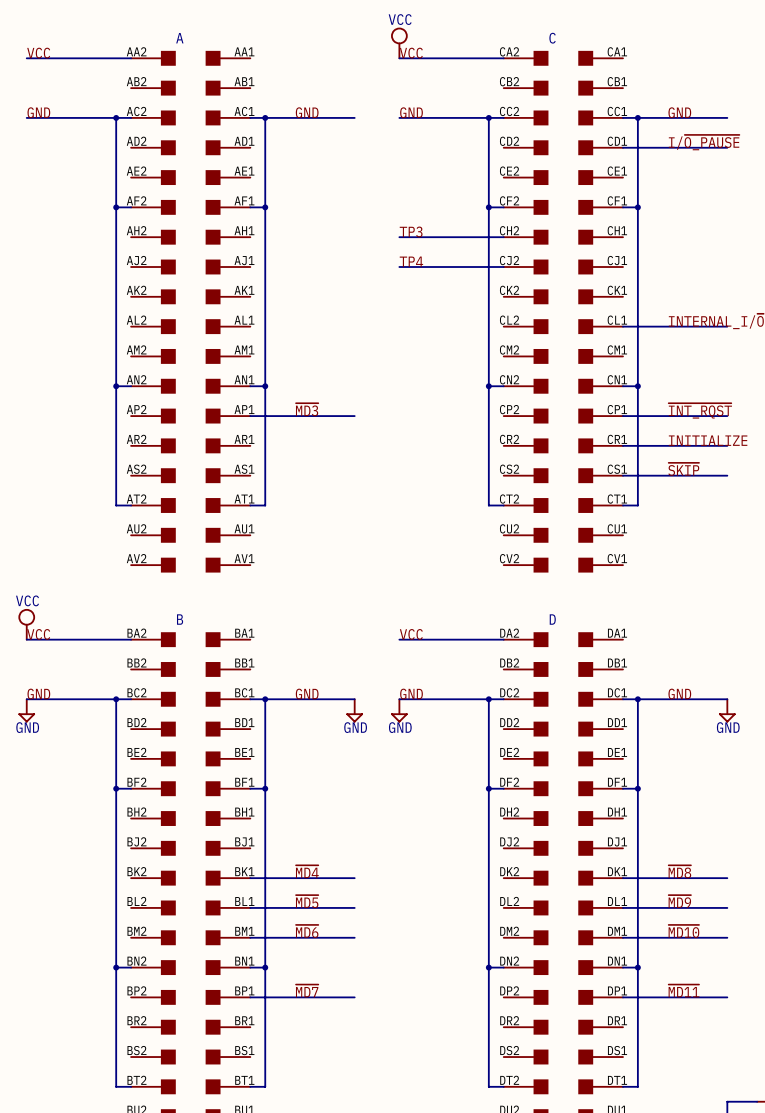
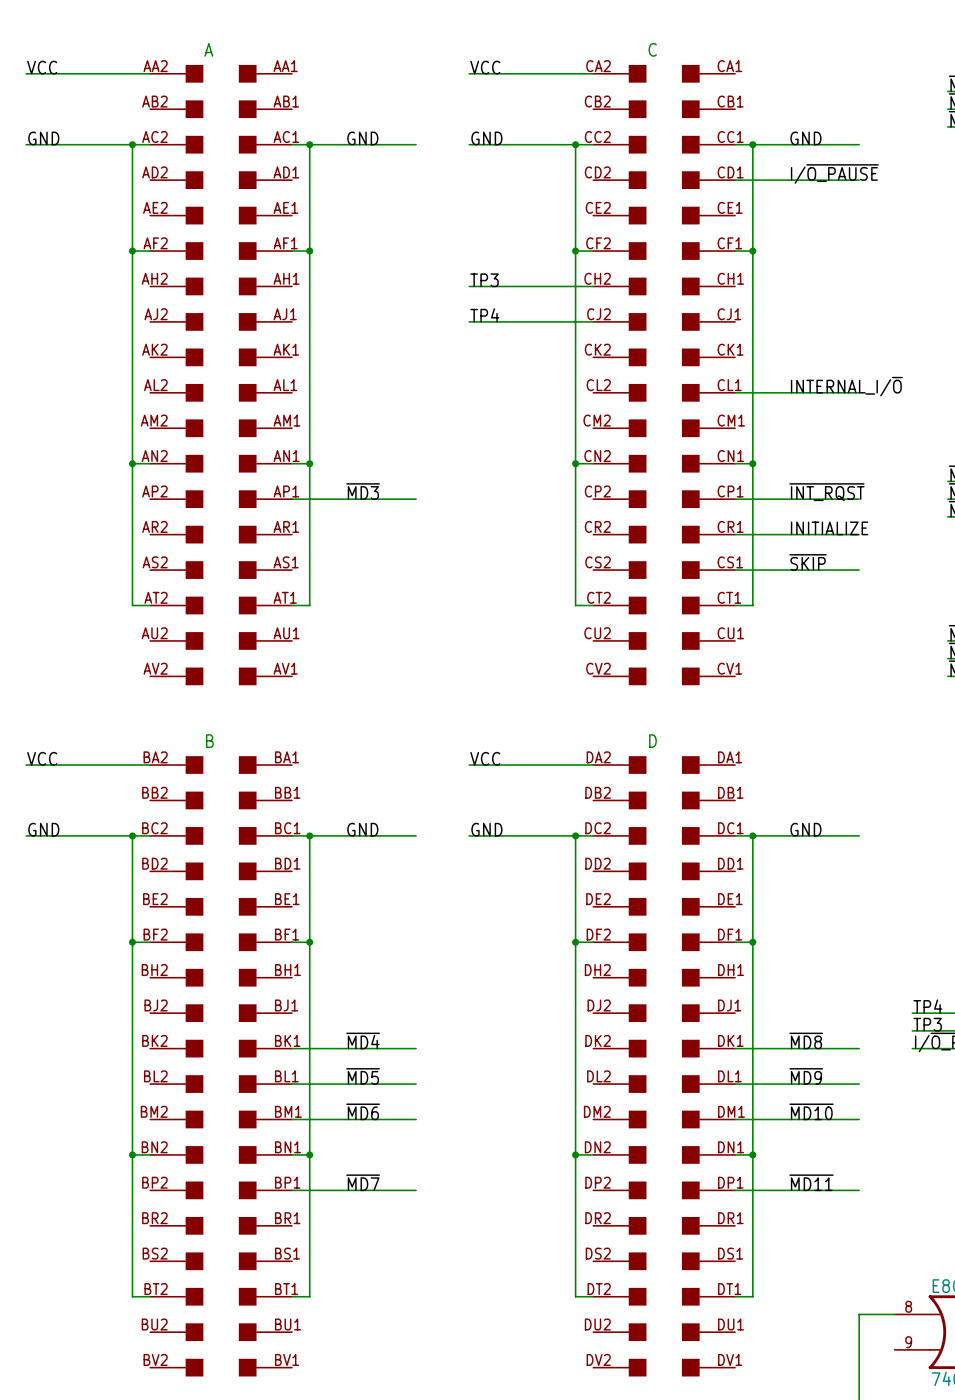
power symbol: VCC (399, 43) -> none
power symbol: VCC (26, 624) -> none
power symbol: GND (26, 710) -> none
power symbol: GND (354, 710) -> none
power symbol: GND (399, 710) -> none
power symbol: GND (727, 710) -> none

